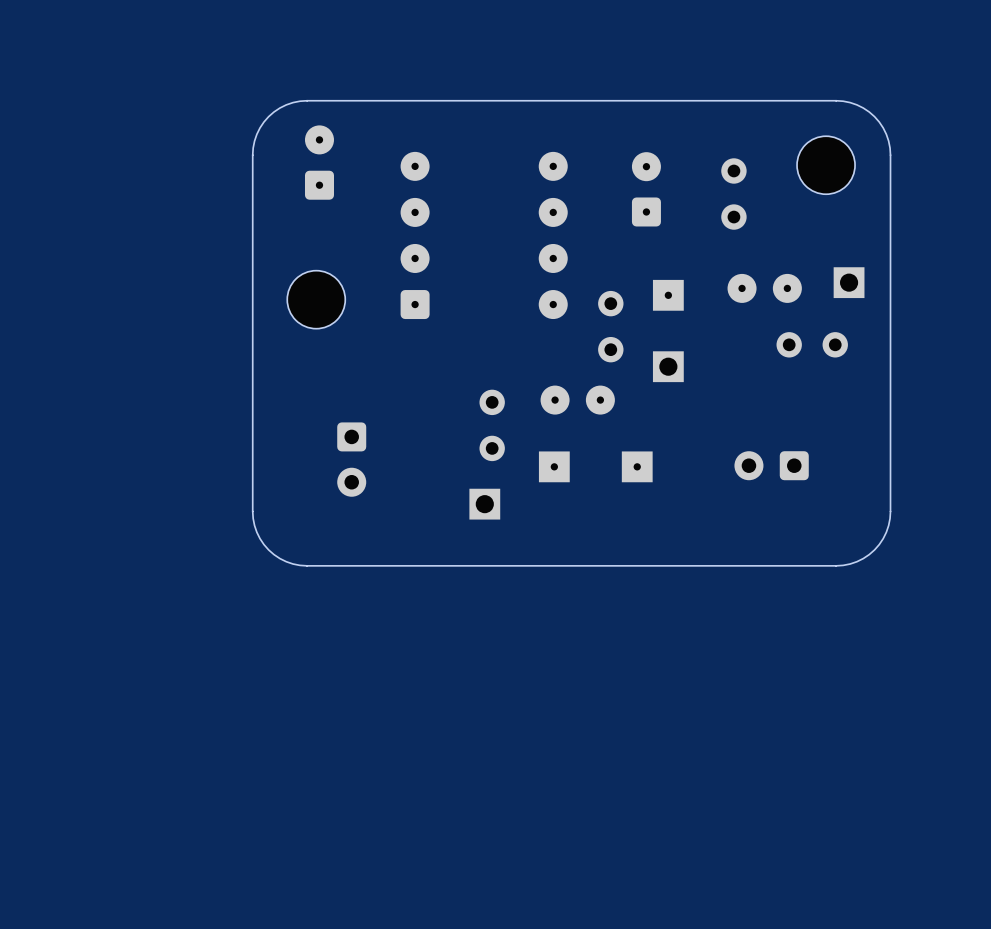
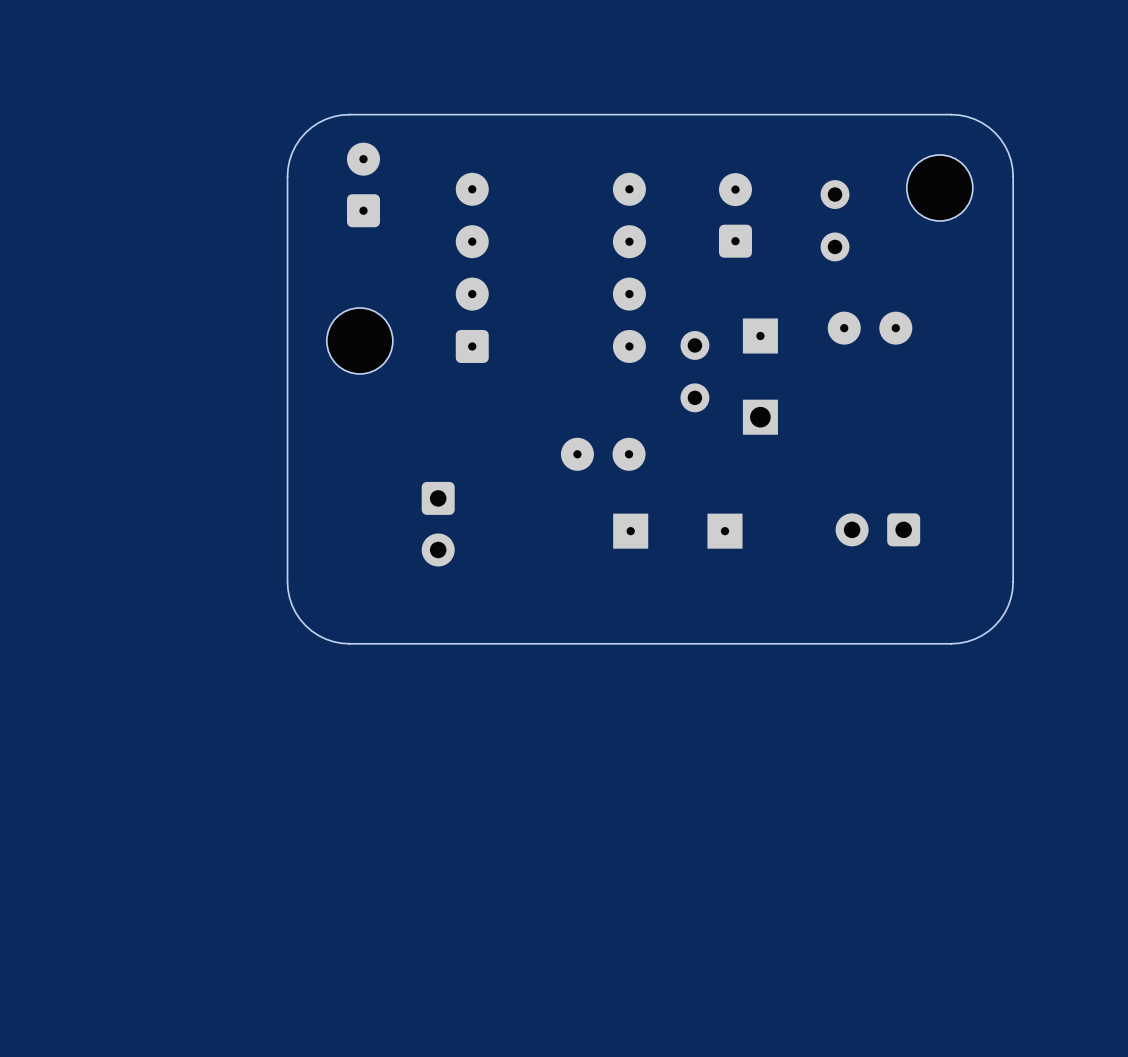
part: (849, 282) -> none
part: (812, 344) -> none
part position: (577, 400) -> (603, 454)
part: (492, 425) -> none
part position: (351, 459) -> (438, 524)
part: (484, 504) -> none

